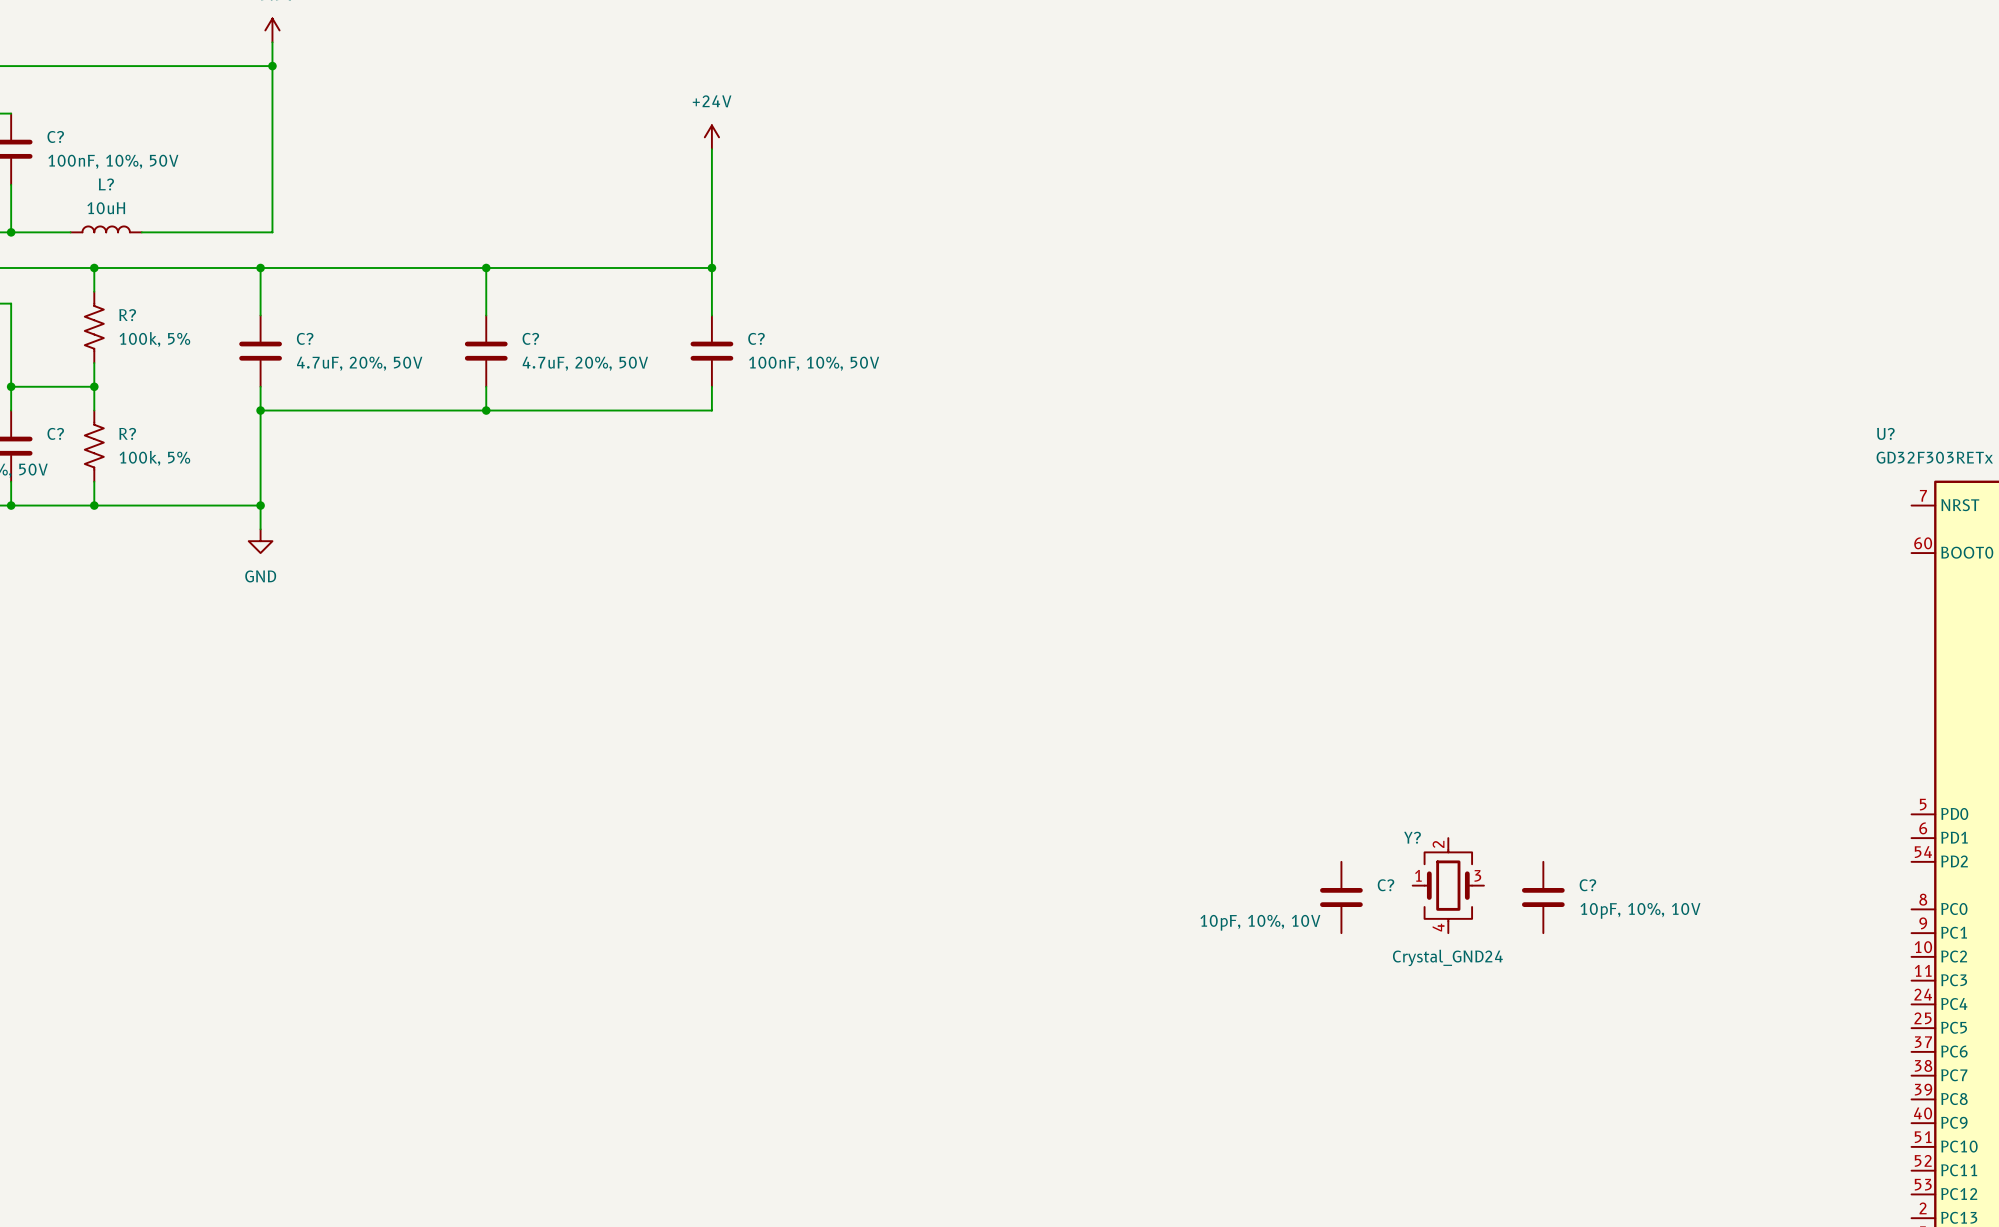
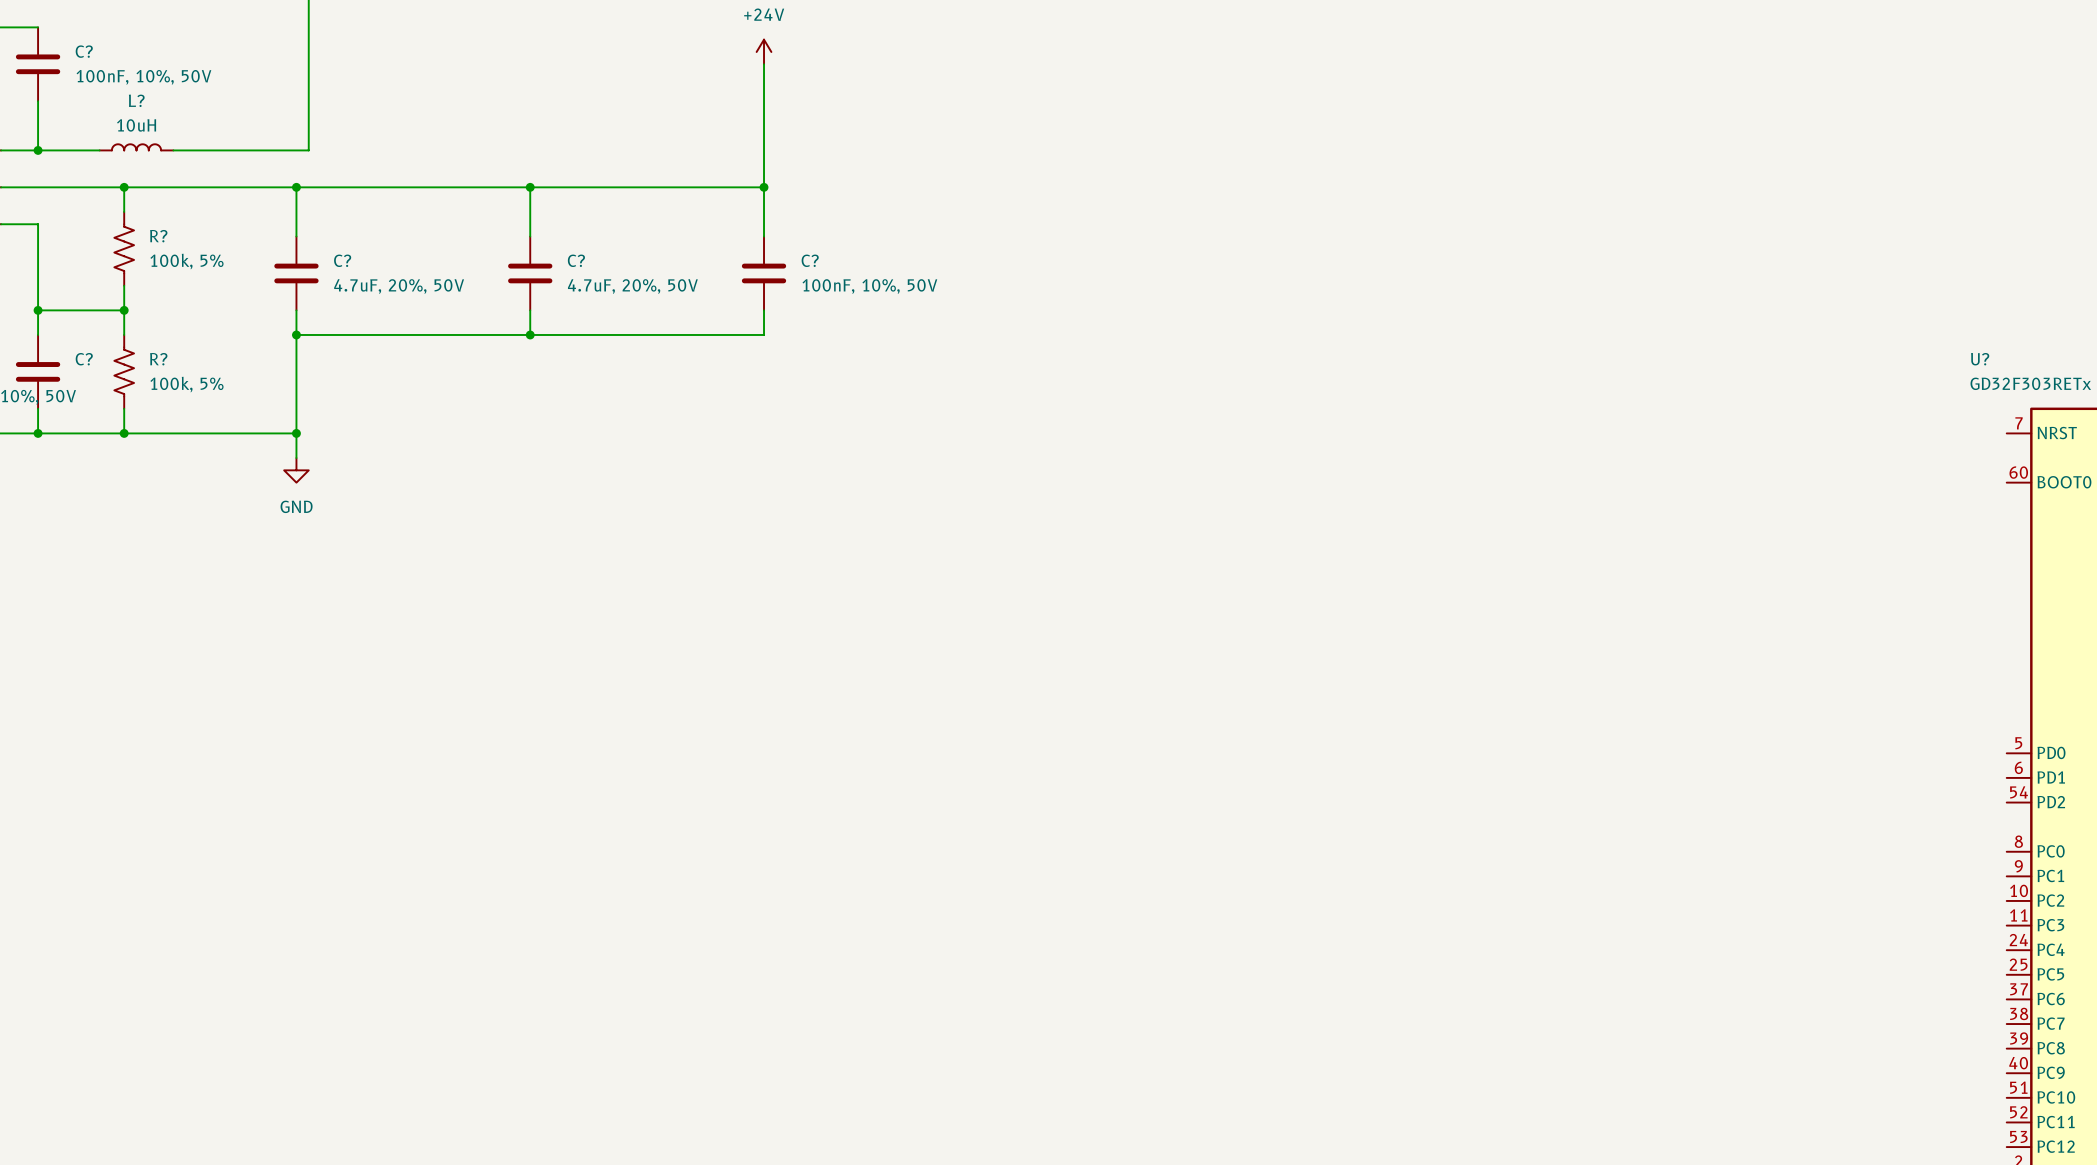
Y?: Crystal_GND24 (1448, 885) -> none
C?: 10pF, 10%, 10V (1341, 897) -> none
C?: 10pF, 10%, 10V (1543, 897) -> none

